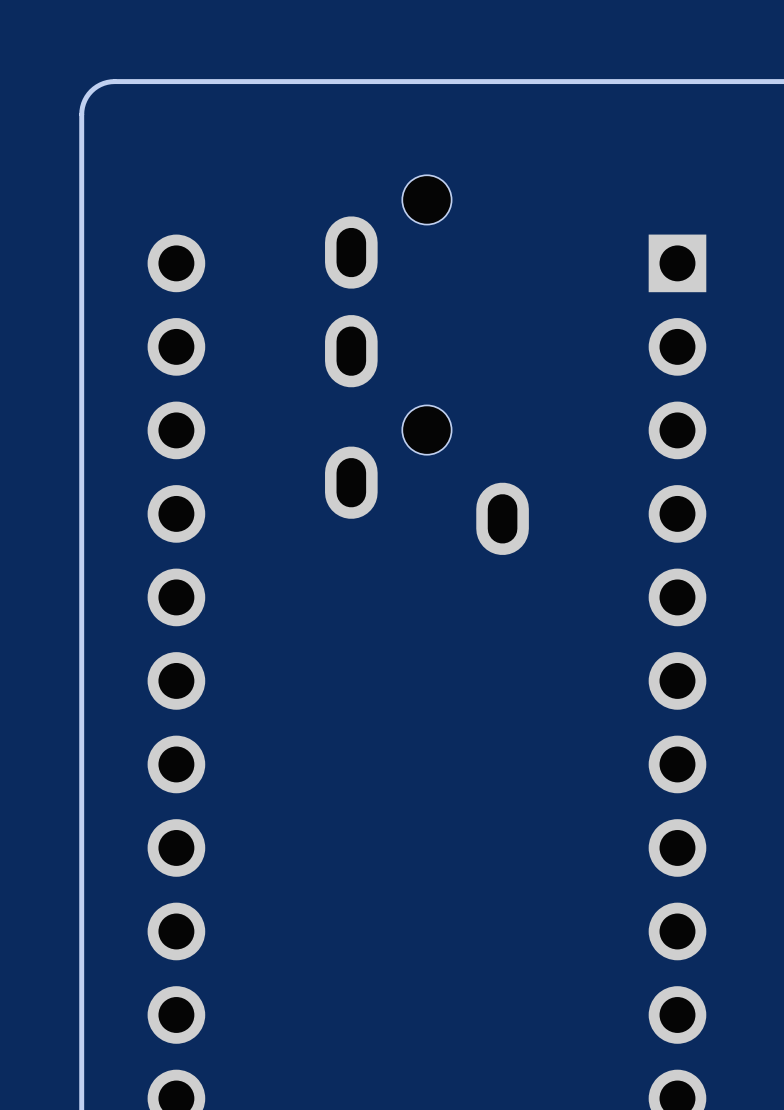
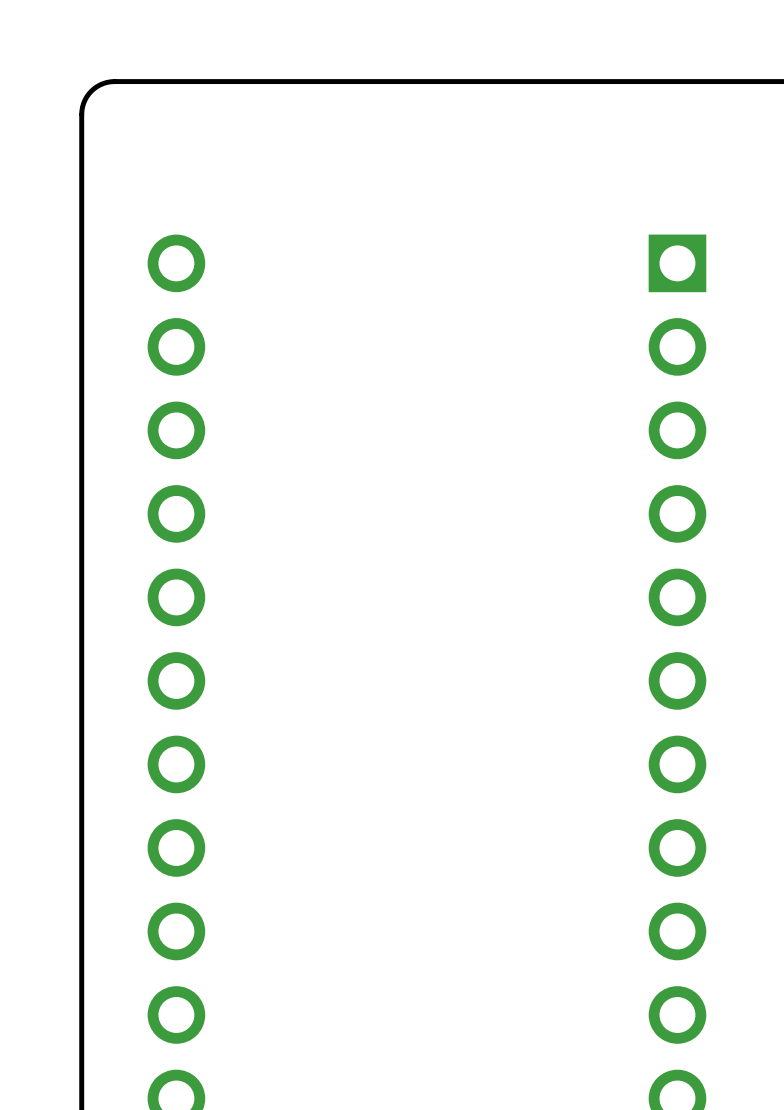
part: (426, 365) -> none

